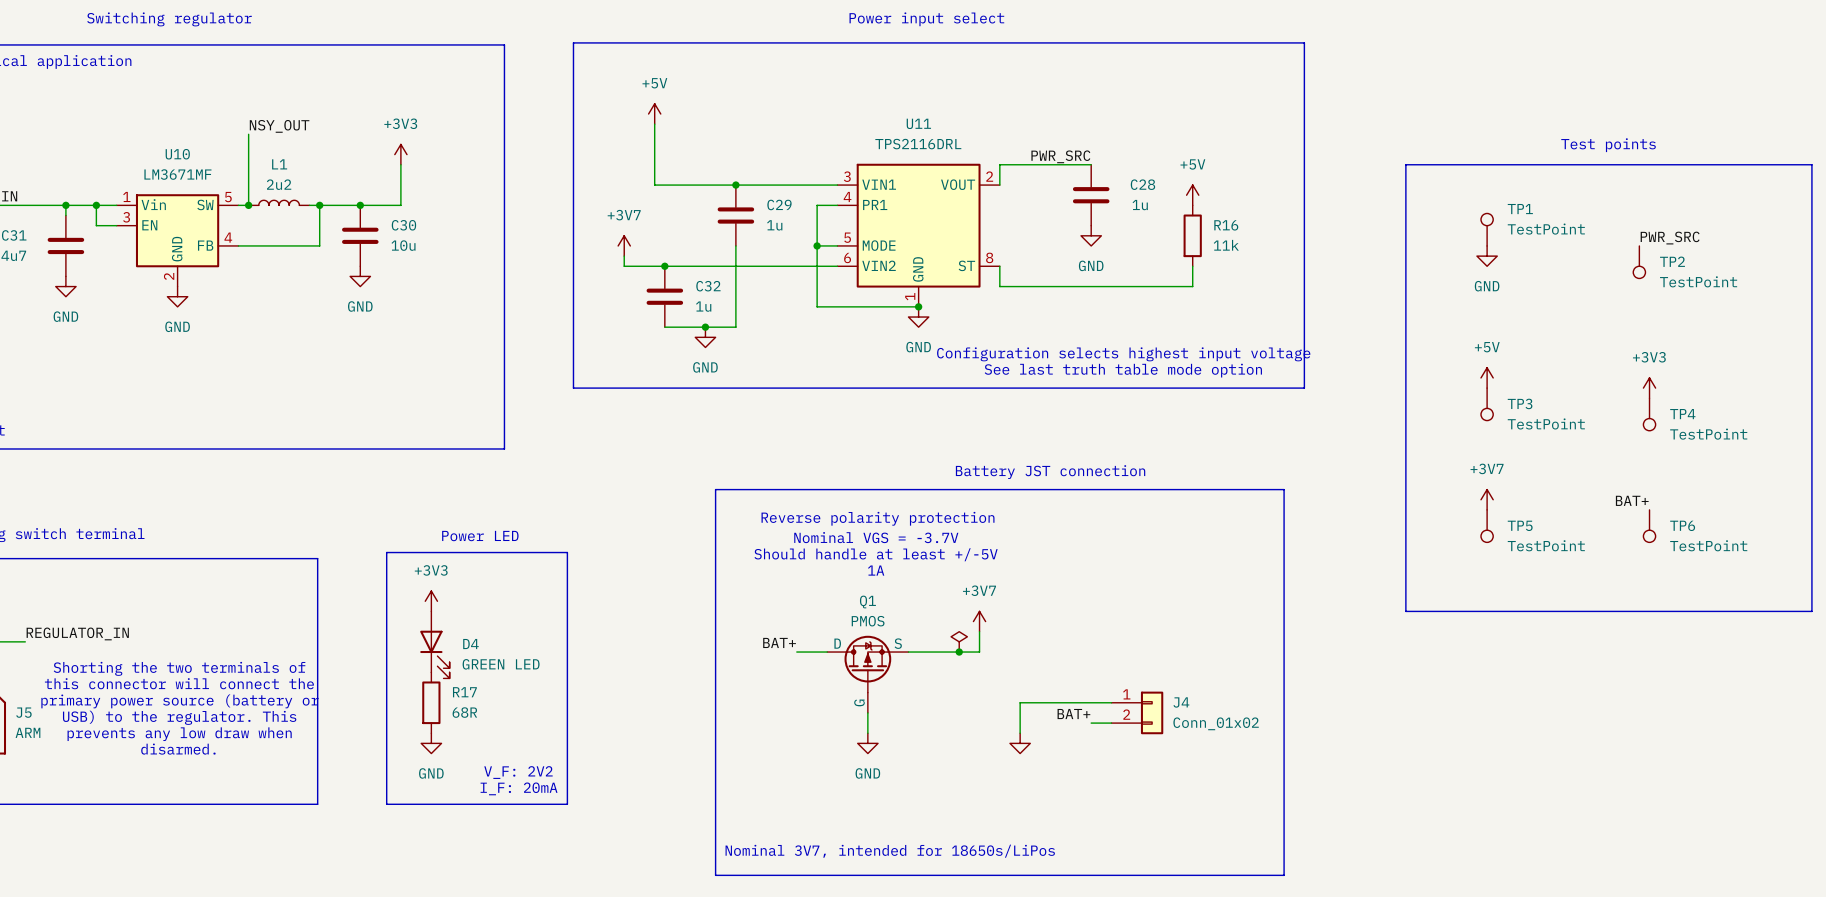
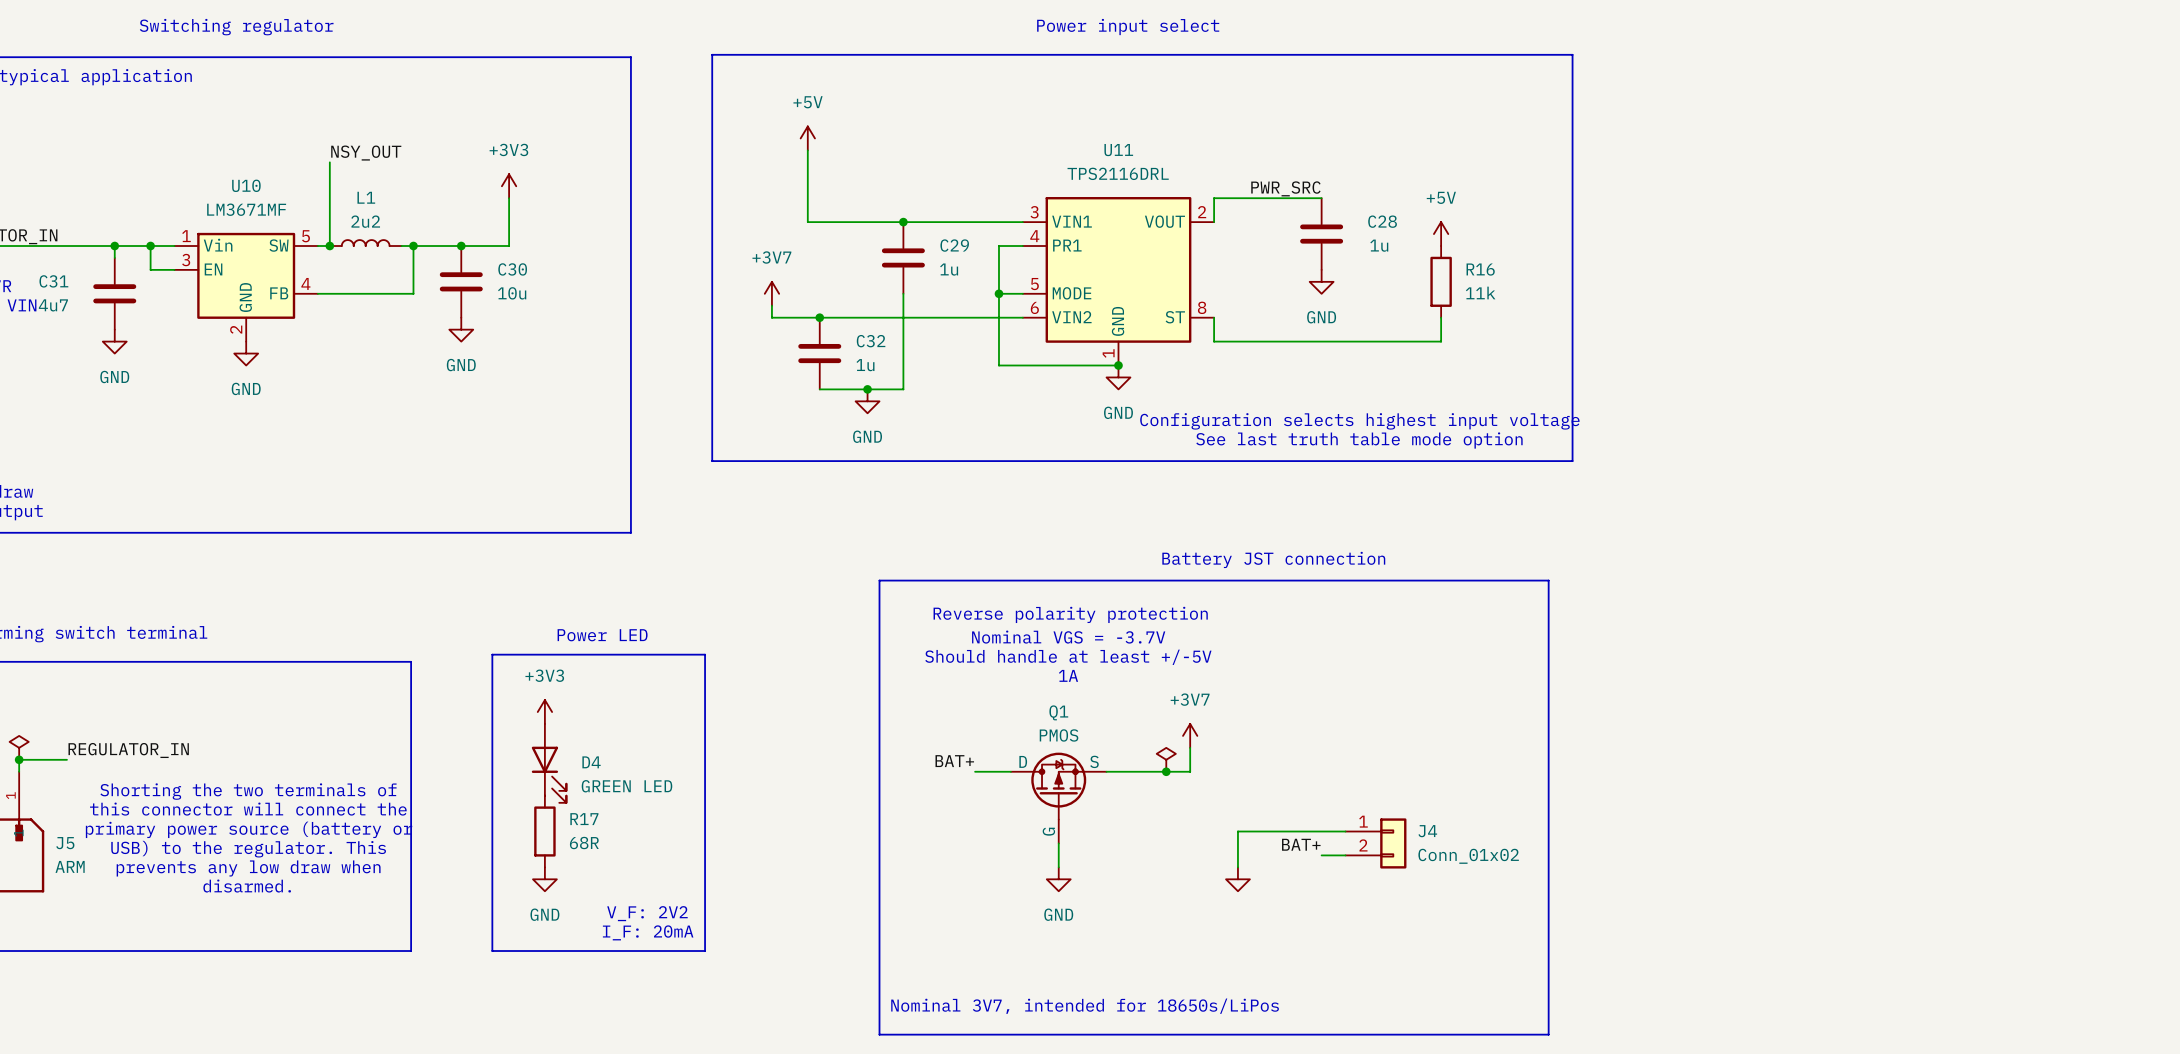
text: Test points (1608, 145) -> none
line: (1405, 164) (1811, 164) (1811, 611) (1405, 611) (1405, 164) -> none
TP1: TestPoint (1487, 229) -> none
label: PWR_SRC (1670, 238) -> none
power symbol: GND (1487, 256) -> none
TP2: TestPoint (1639, 262) -> none
power symbol: +5V (1487, 377) -> none
power symbol: +3V3 (1649, 388) -> none
TP3: TestPoint (1487, 404) -> none
TP4: TestPoint (1649, 414) -> none
power symbol: +3V7 (1487, 499) -> none
label: BAT+ (1632, 500) -> none
TP5: TestPoint (1487, 526) -> none
TP6: TestPoint (1649, 526) -> none

